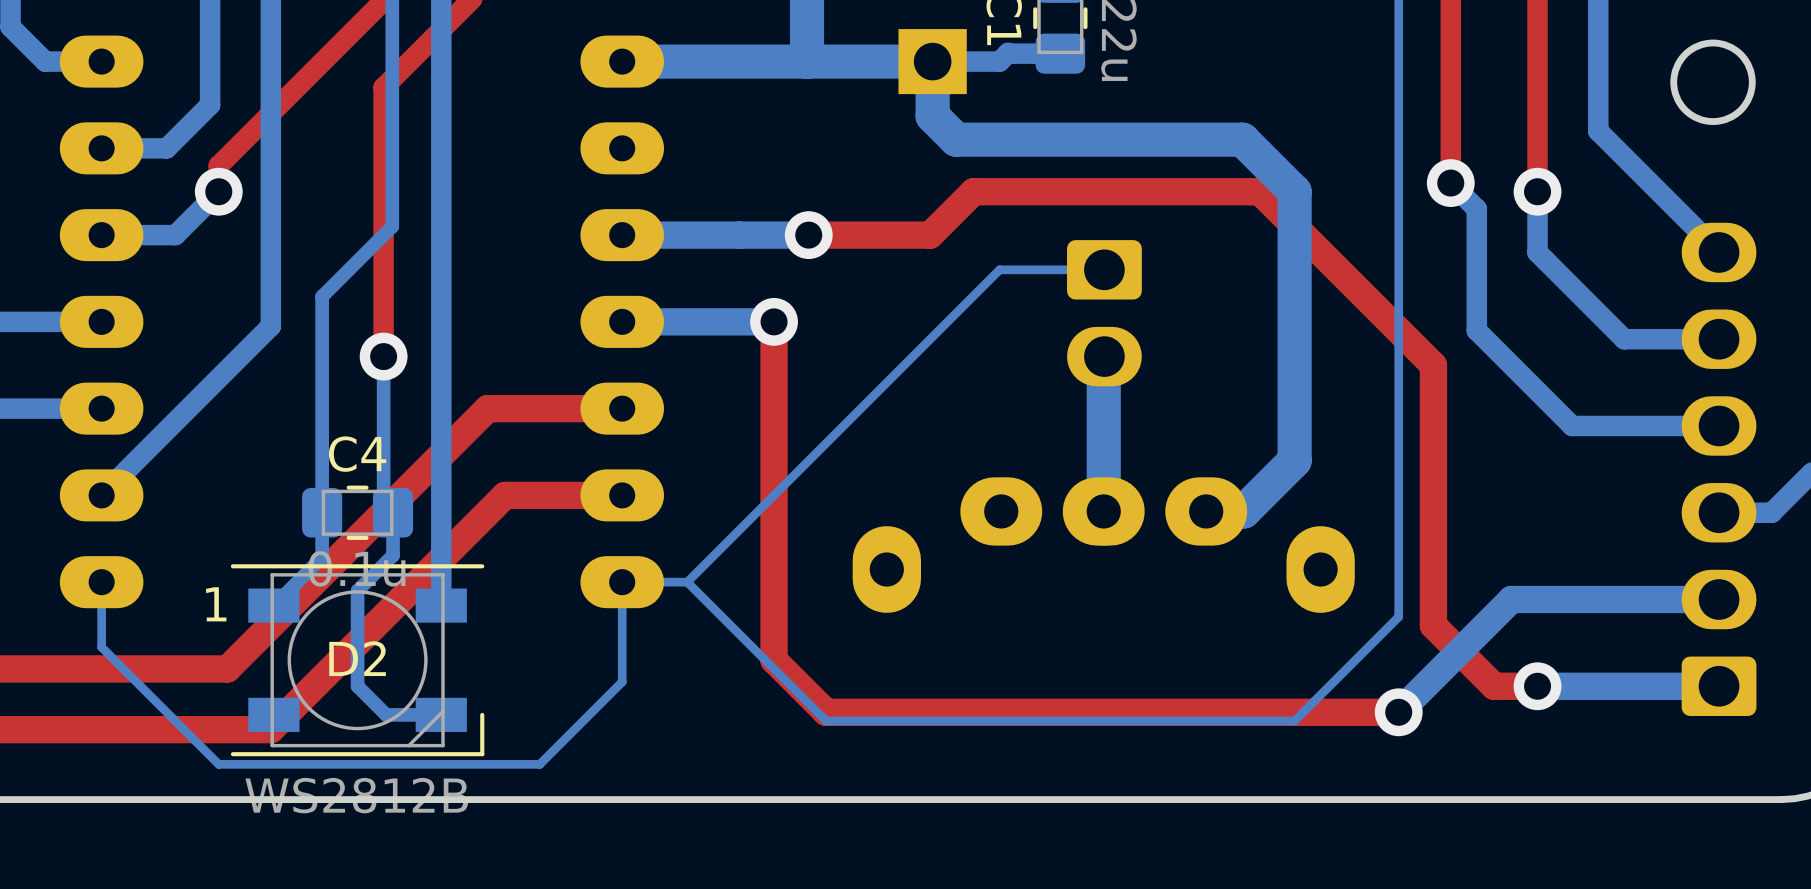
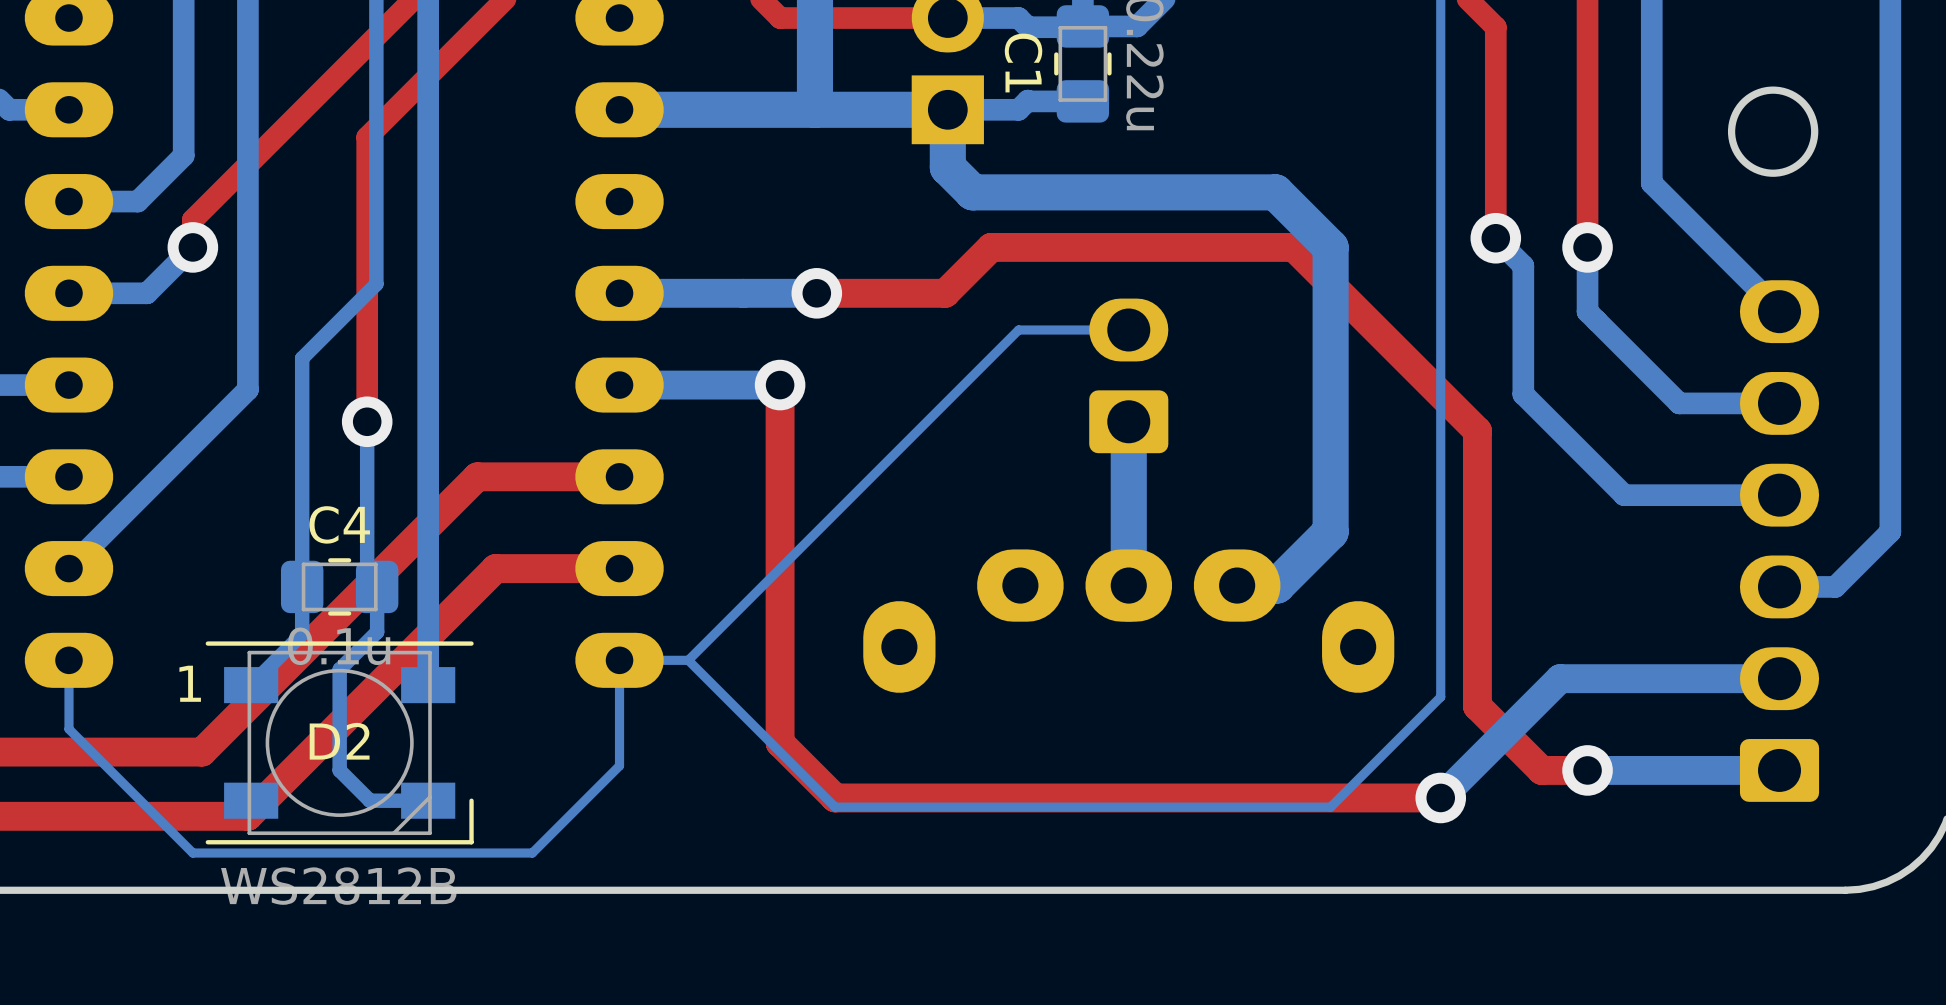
part rotation: 0° (1104, 313) -> 180° (1128, 375)

